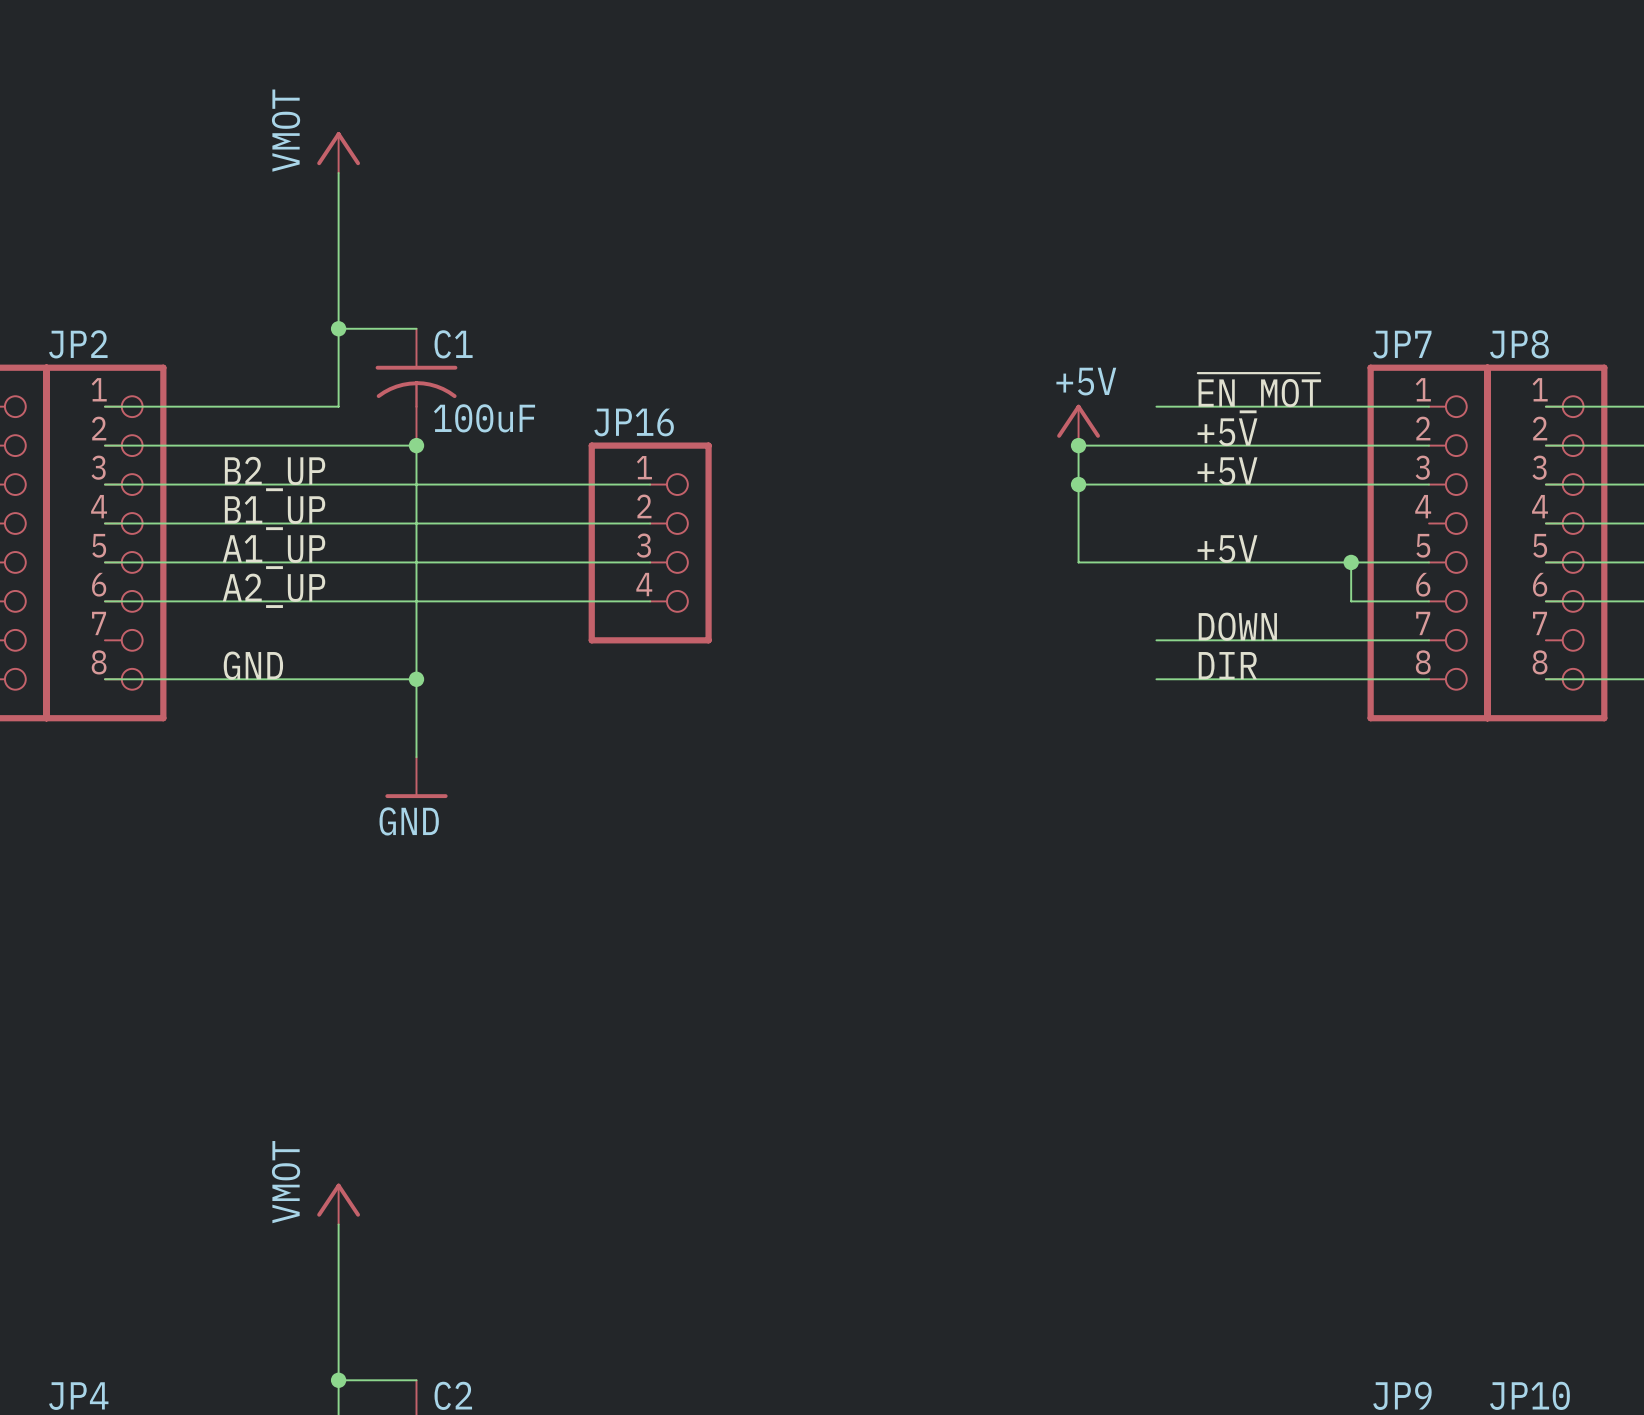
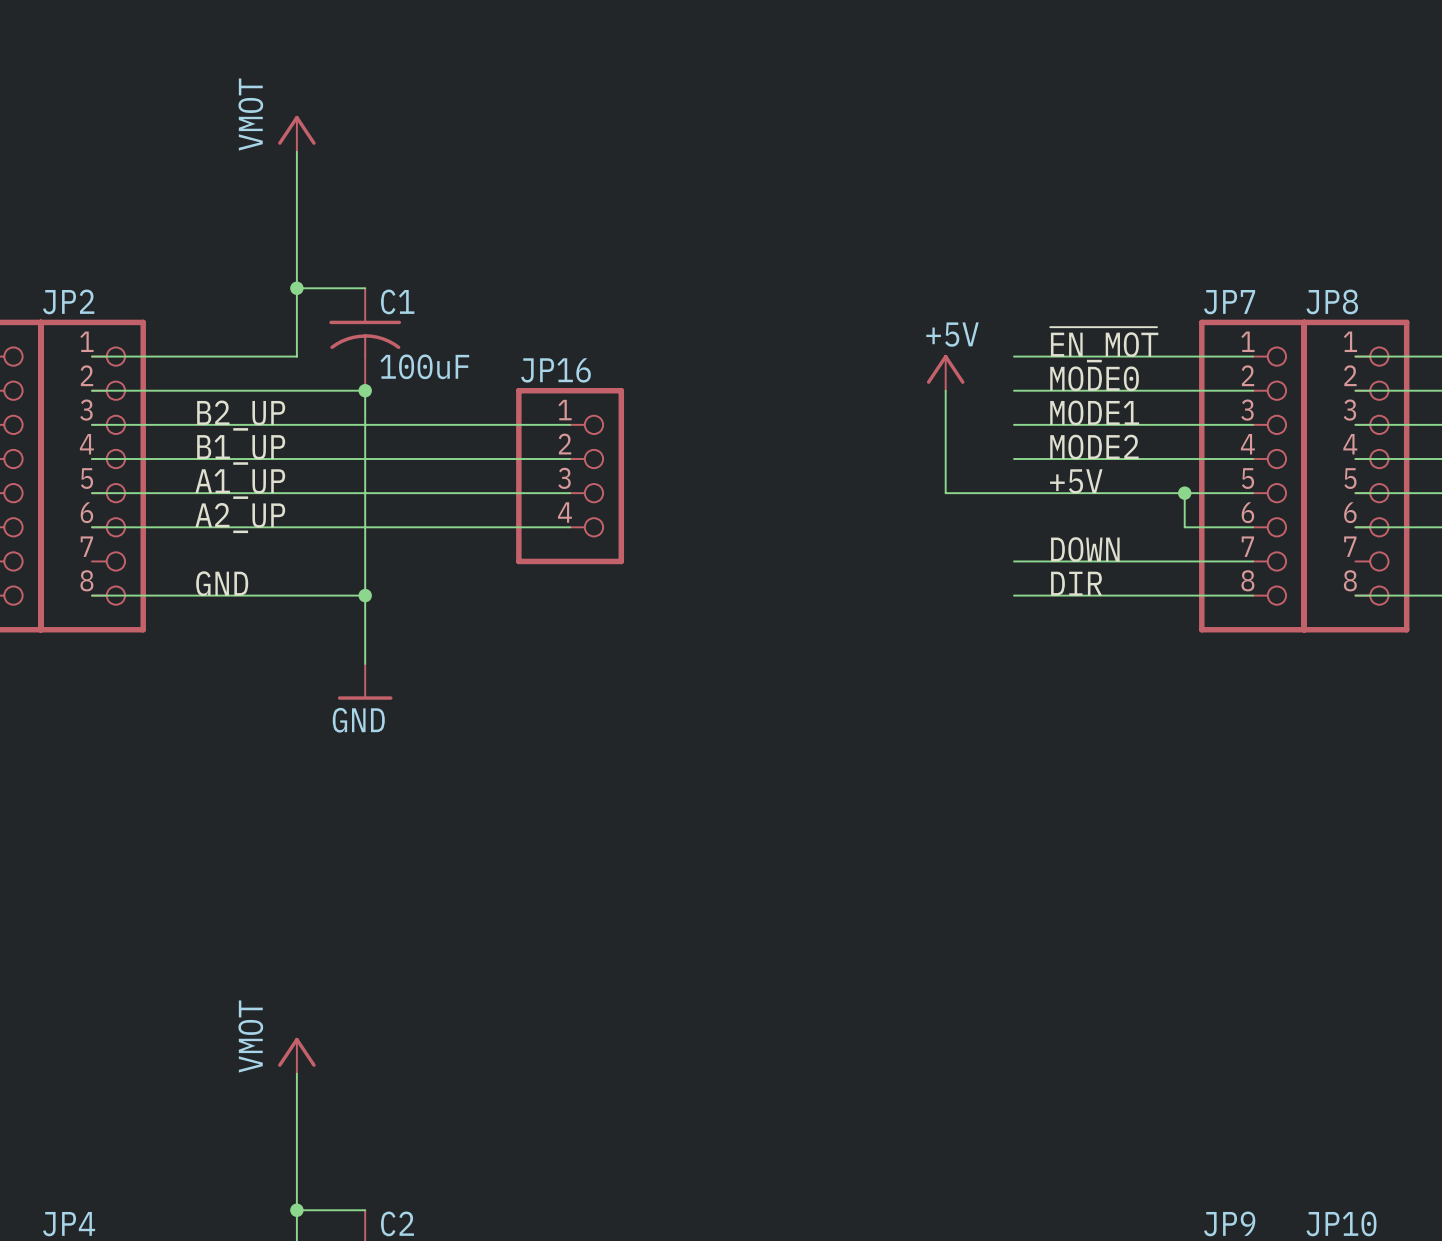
label: +5V (1227, 432) -> MODE0 (1094, 378)
wire: (1078, 445) (1156, 445) -> none
junction: (1078, 445) -> none
label: +5V (1227, 471) -> MODE1 (1094, 412)
wire: (1078, 484) (1156, 484) -> none
junction: (1078, 484) -> none
label: none -> MODE2 (1094, 447)
wire: none -> (1013, 459) (1253, 459)

